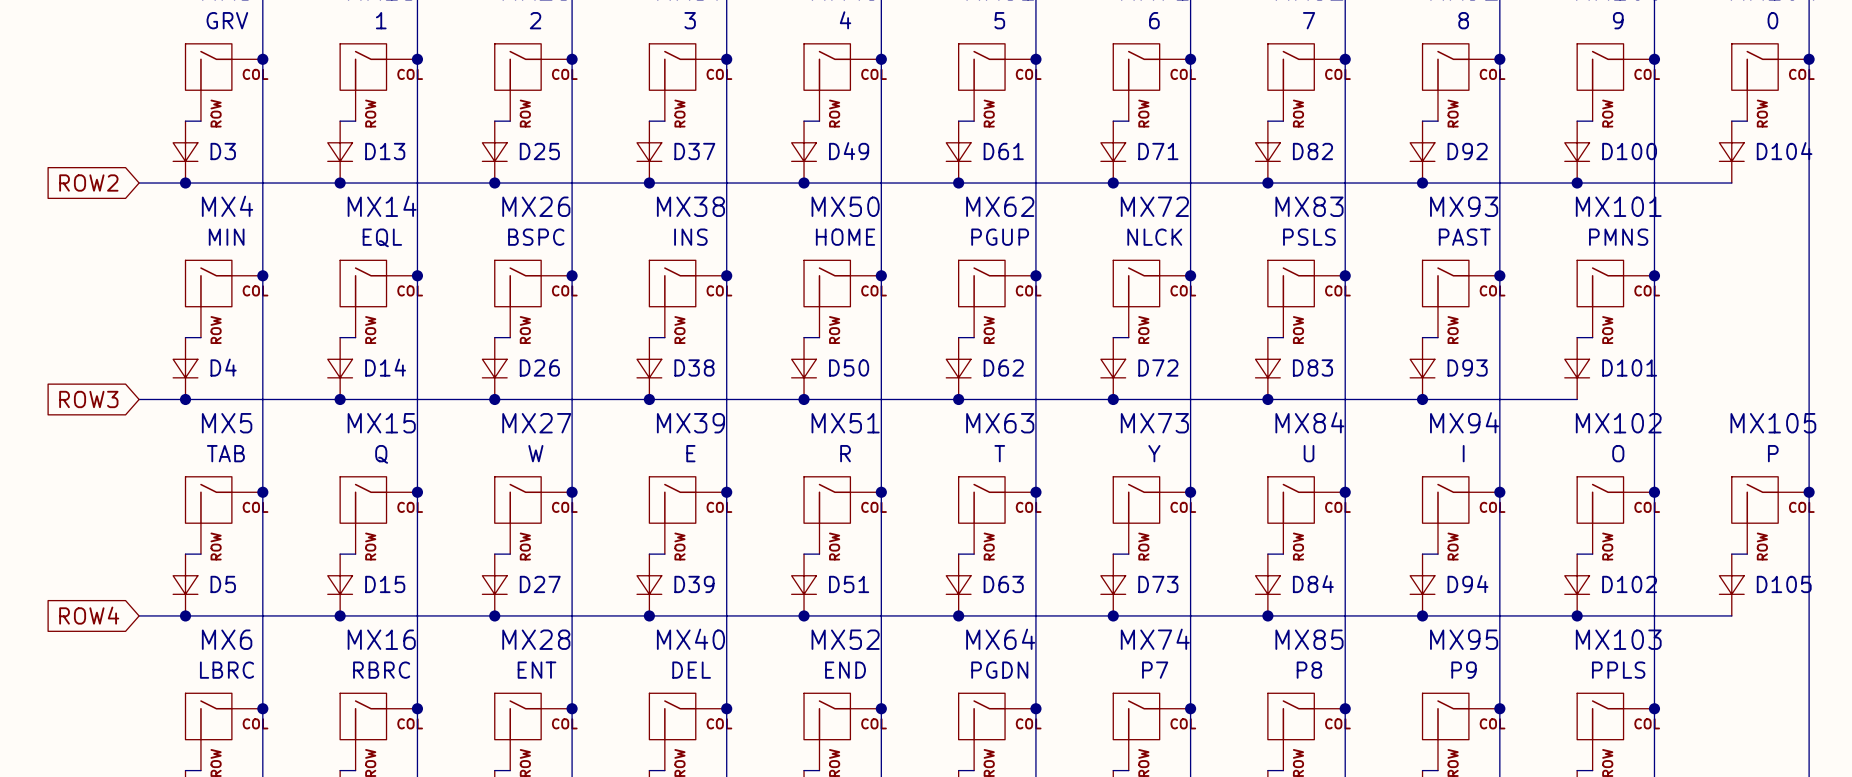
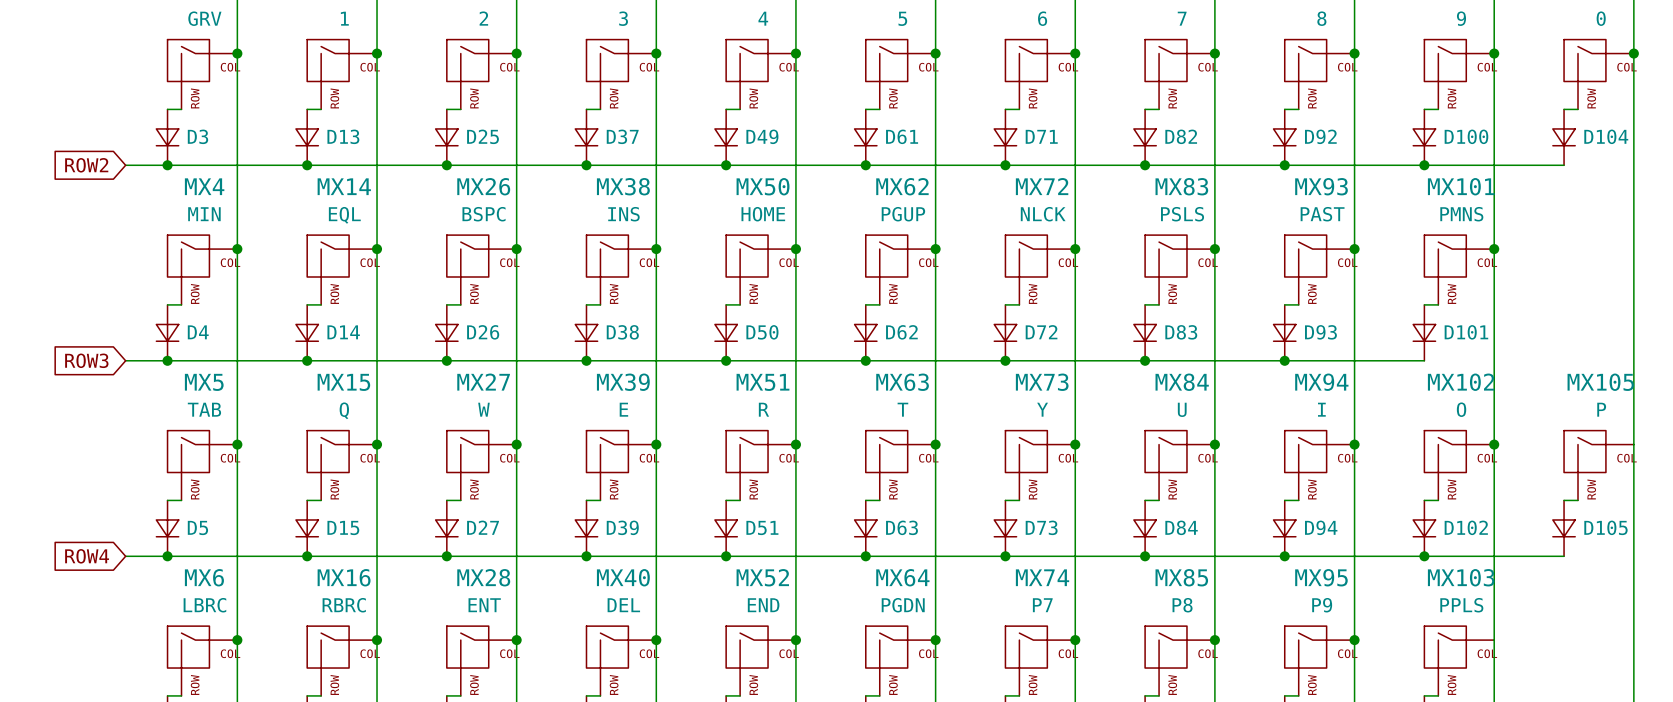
junction: (1809, 492) -> none
junction: (1654, 708) -> none

